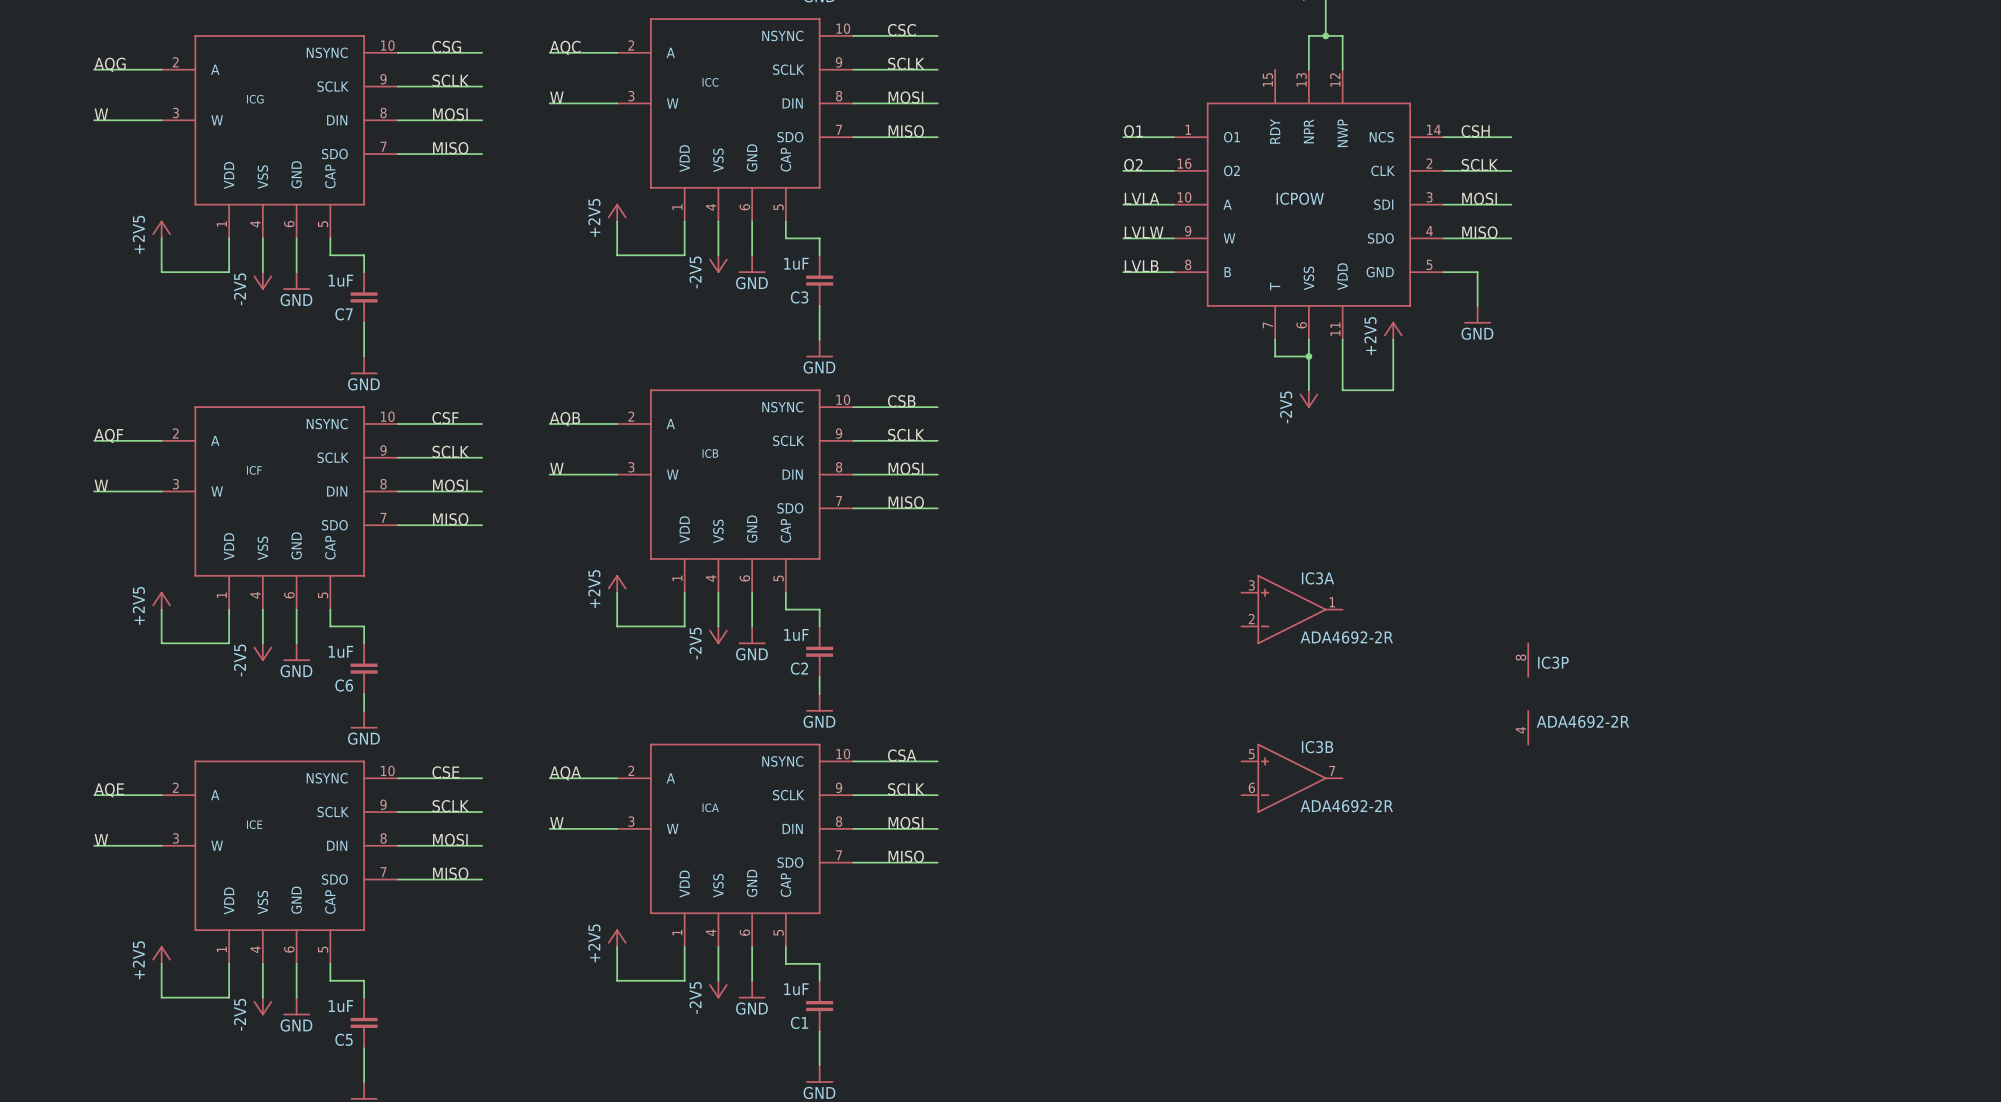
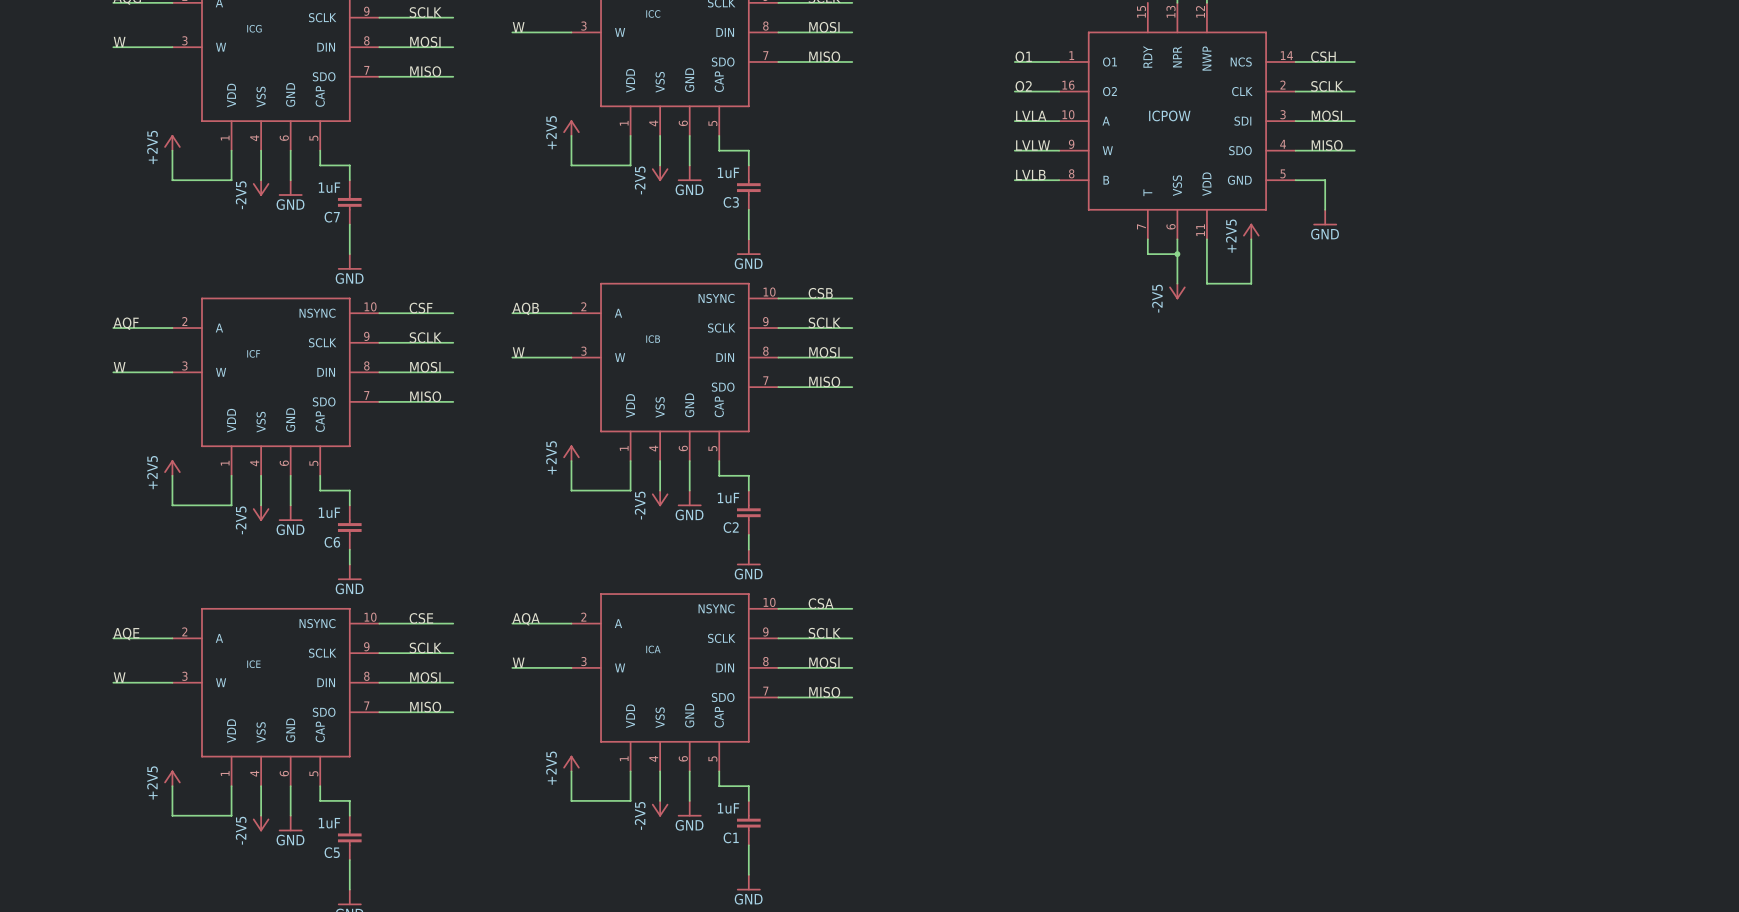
IC3A: ADA4692-2R (1292, 609) -> none
IC3P: ADA4692-2R (1528, 693) -> none
IC3B: ADA4692-2R (1292, 778) -> none

